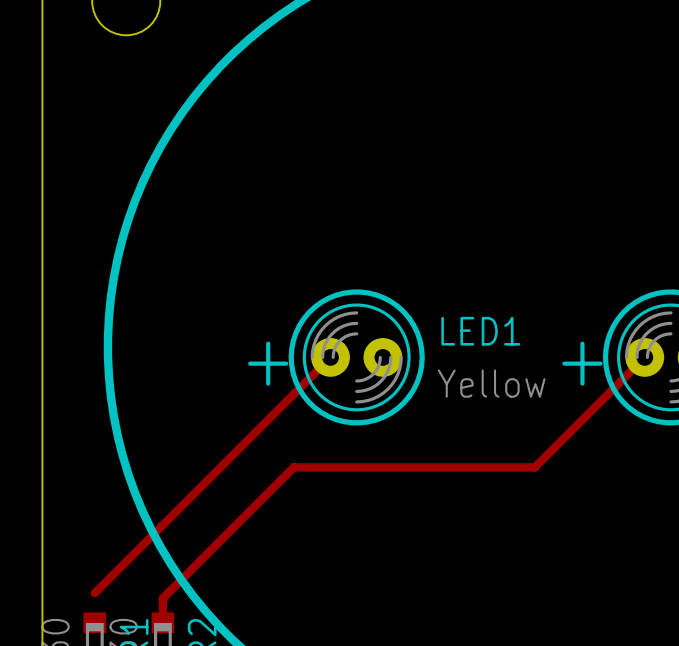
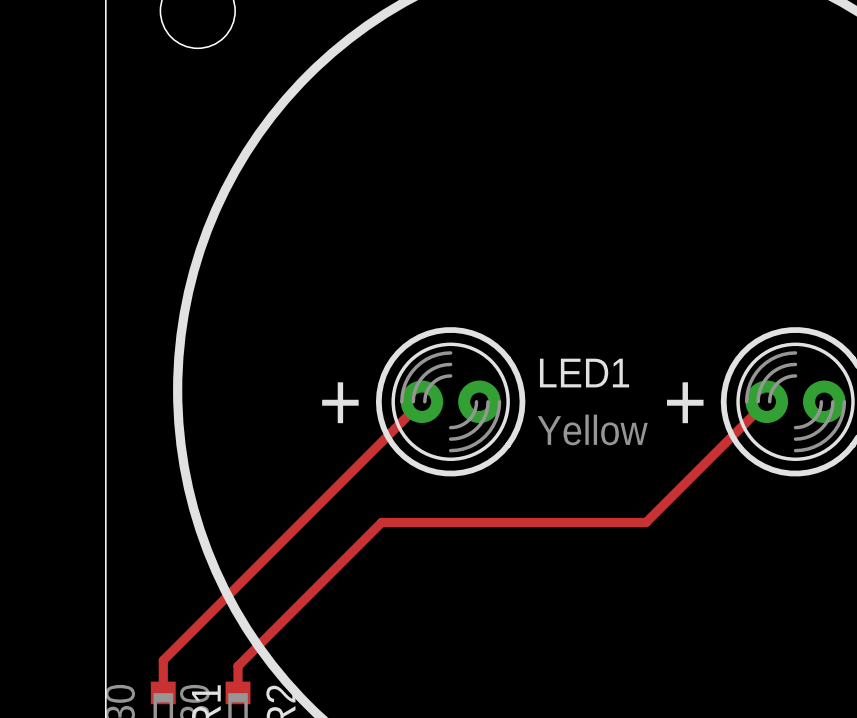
top track: none -> (163, 660) (163, 692)

